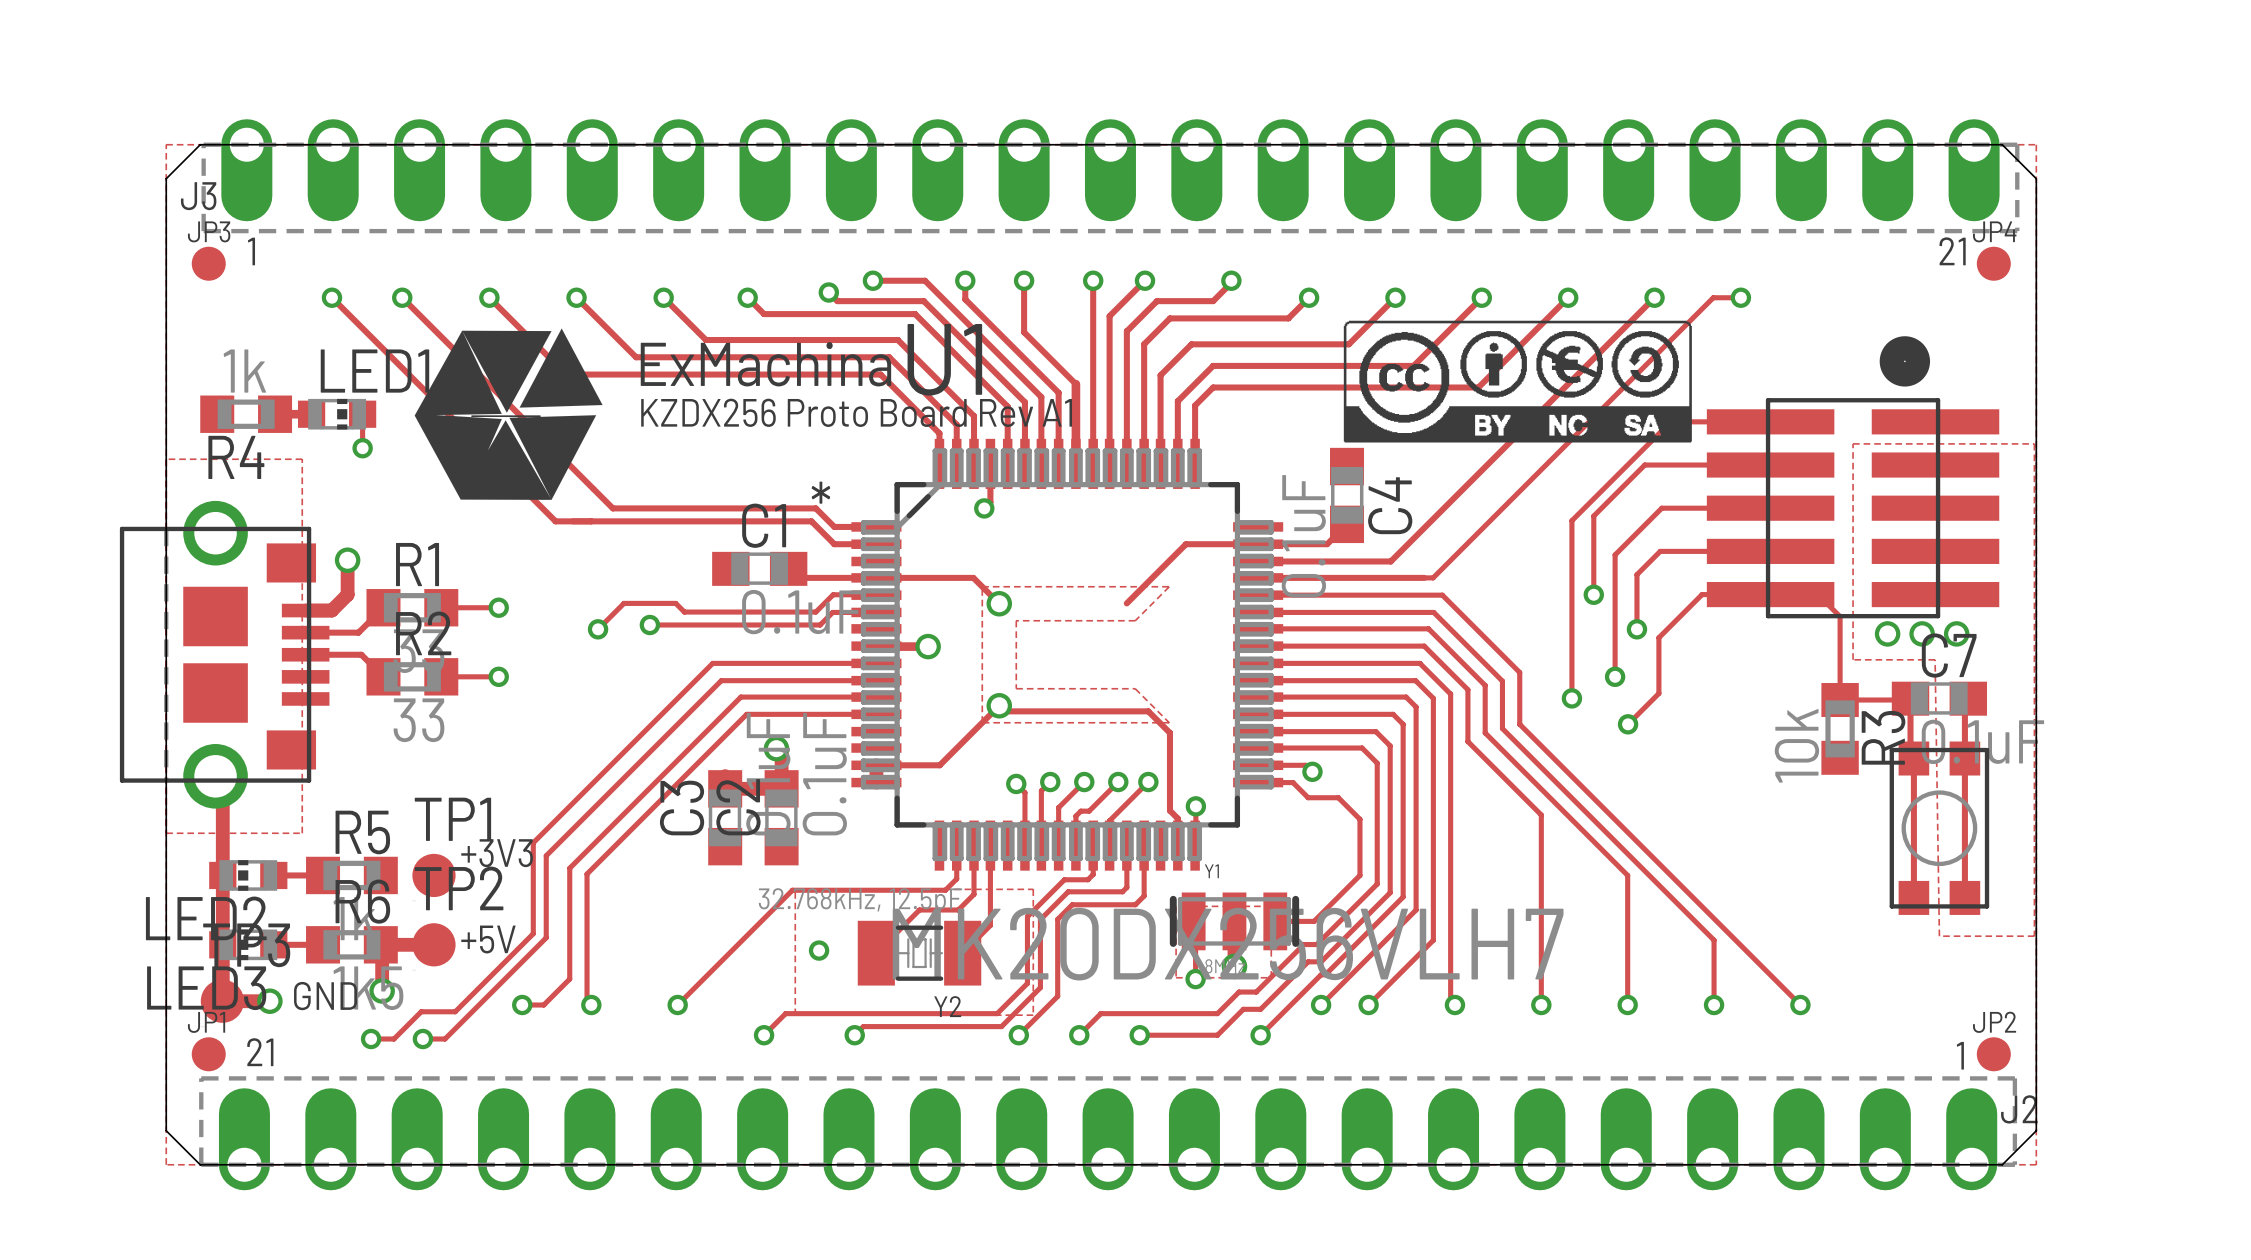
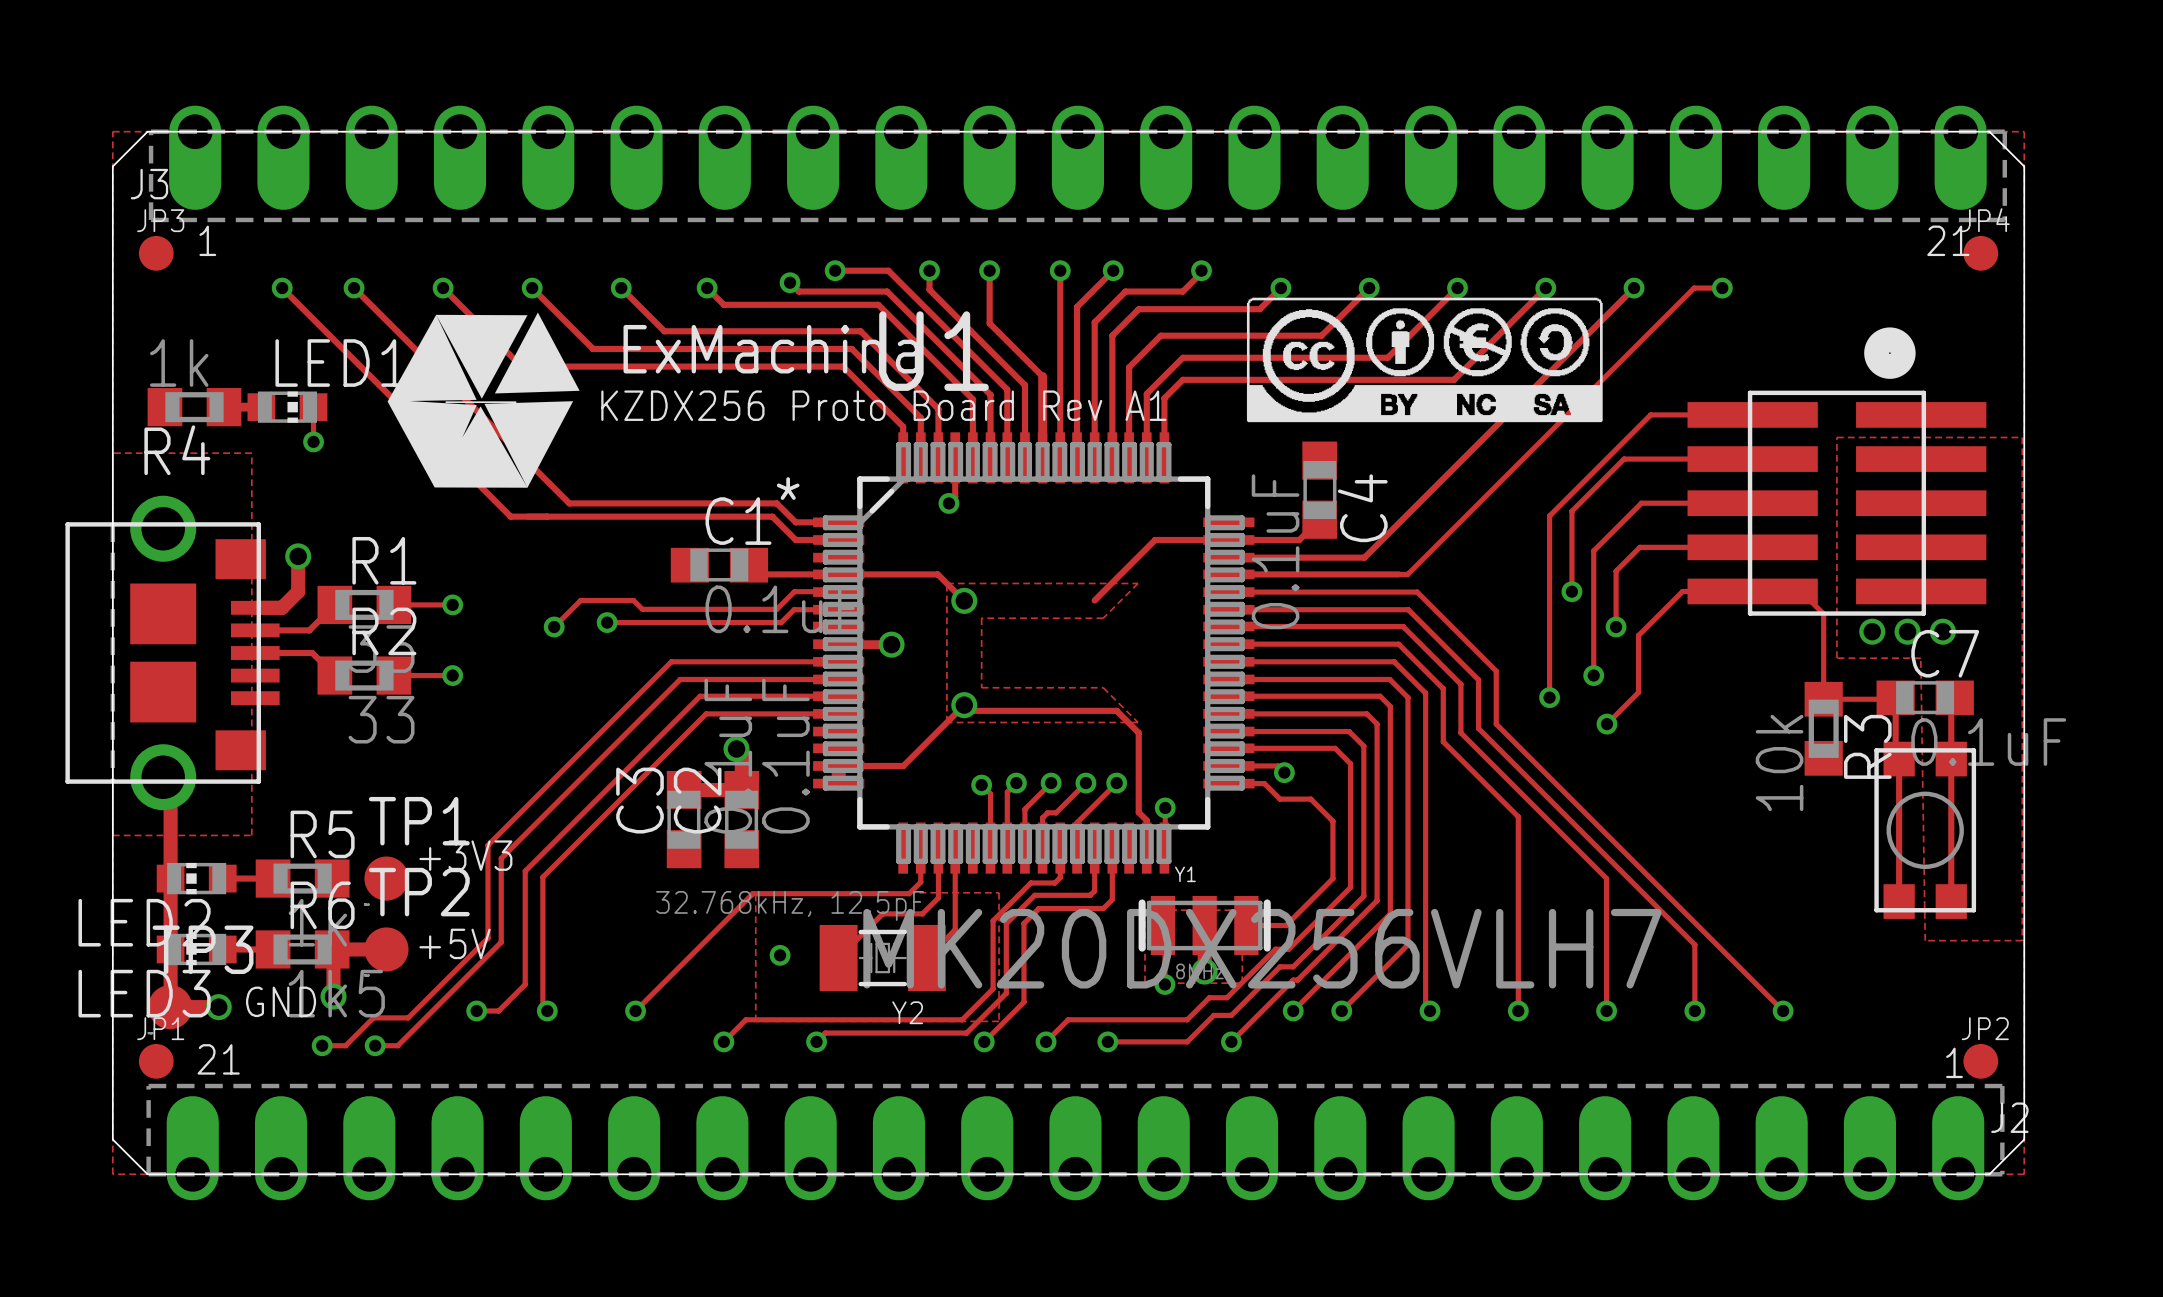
drawing position: (1517, 381) -> (1424, 359)
drawing position: (508, 414) -> (483, 400)

